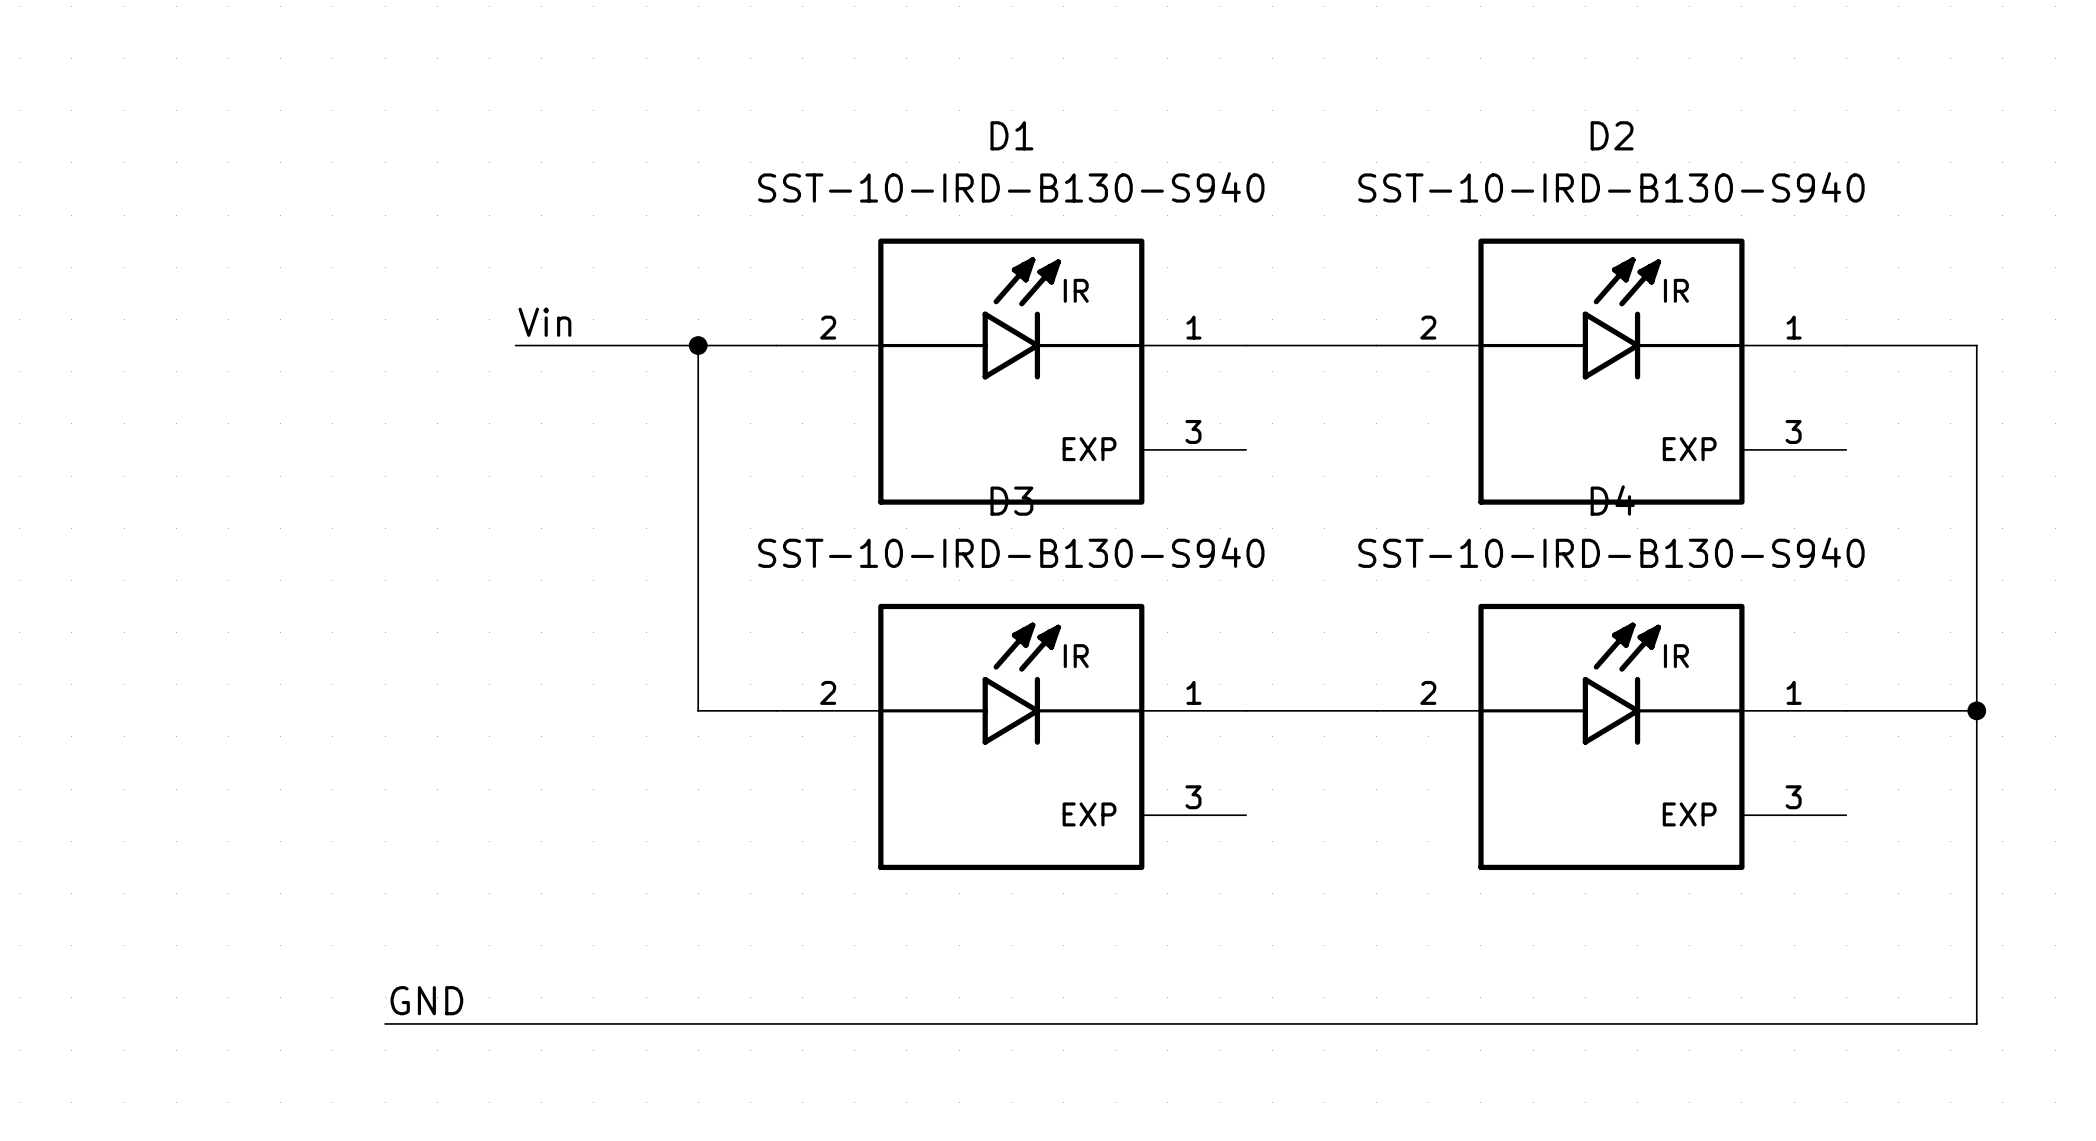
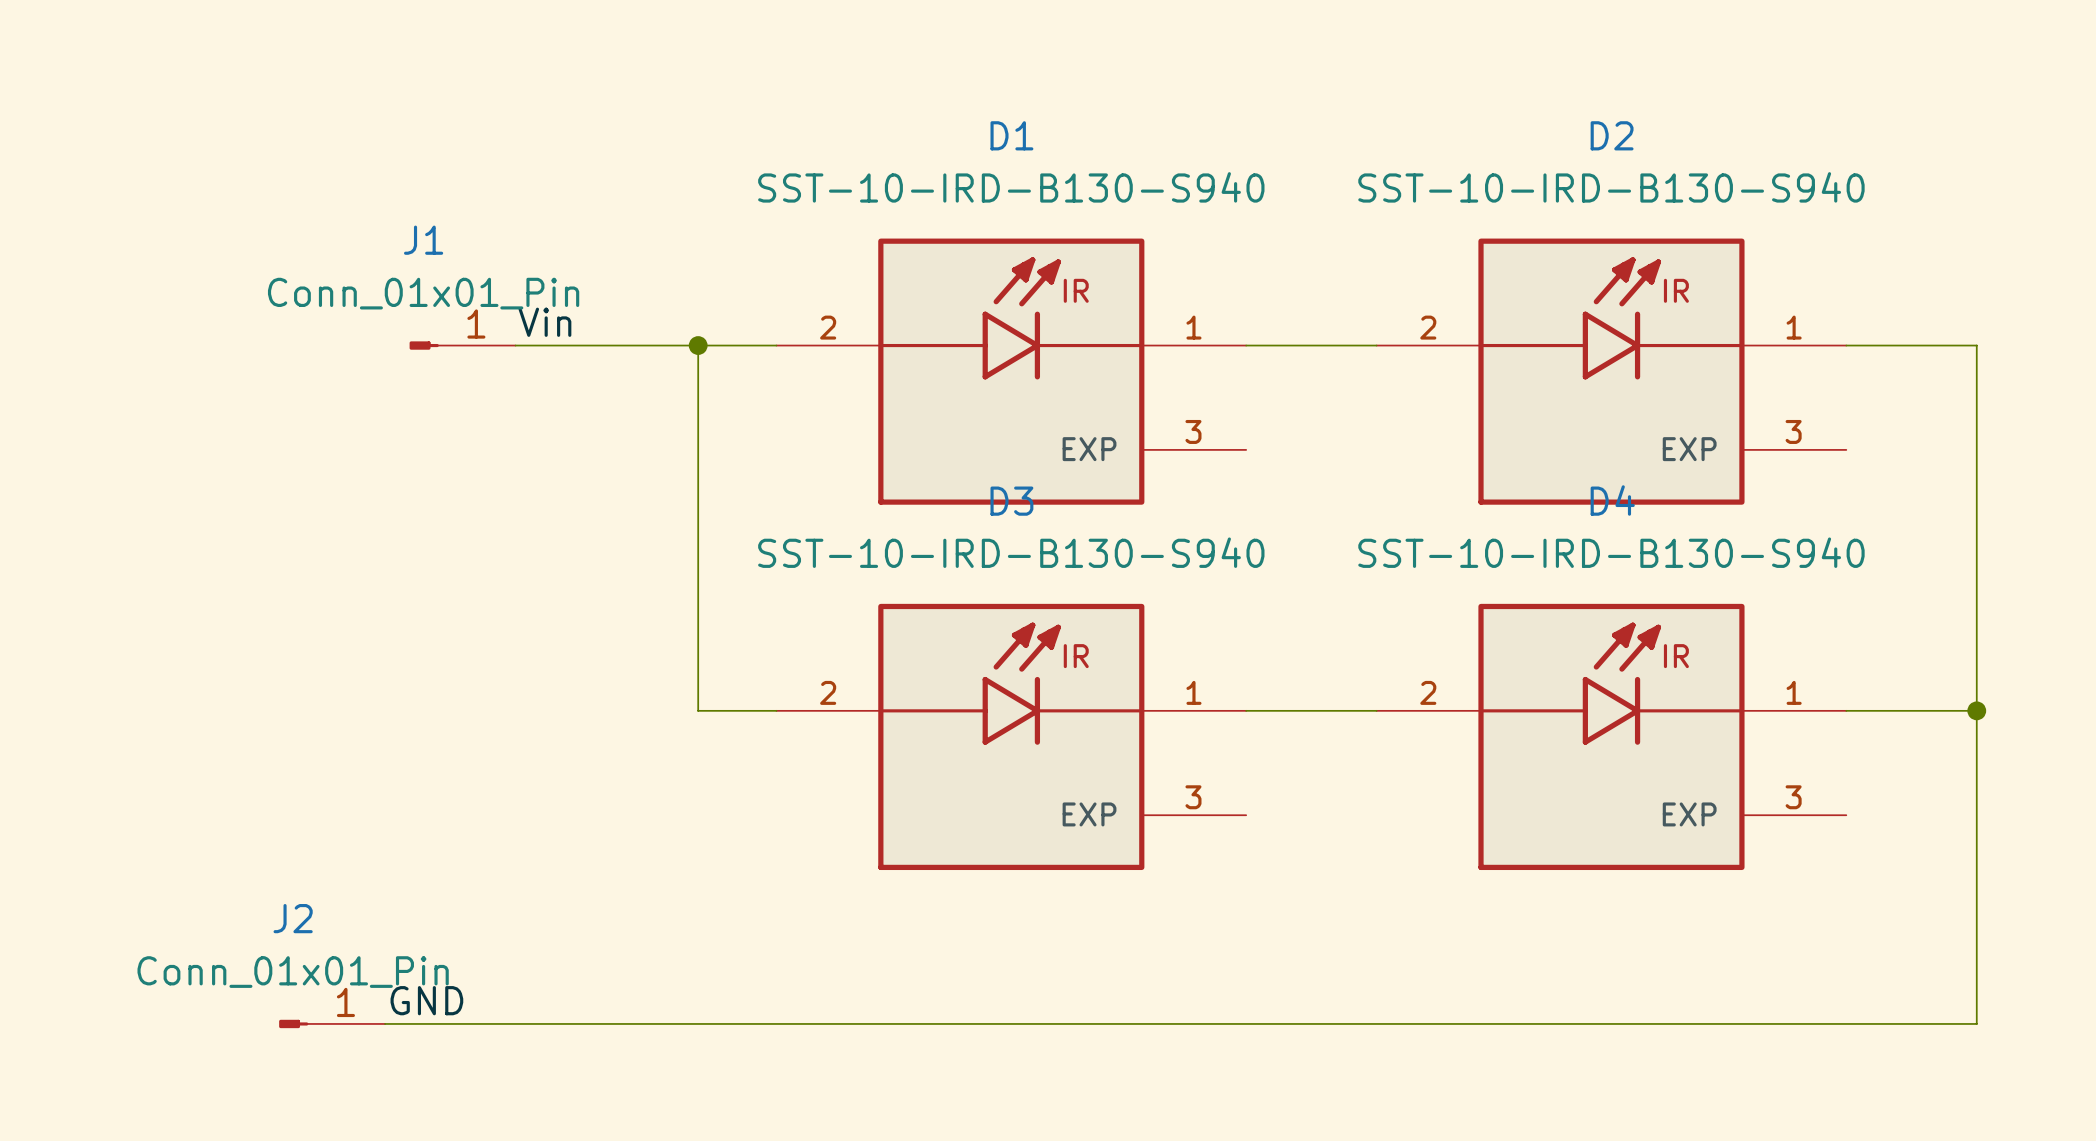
J1: none -> Conn_01x01_Pin (462, 345)
J2: none -> Conn_01x01_Pin (332, 1023)

